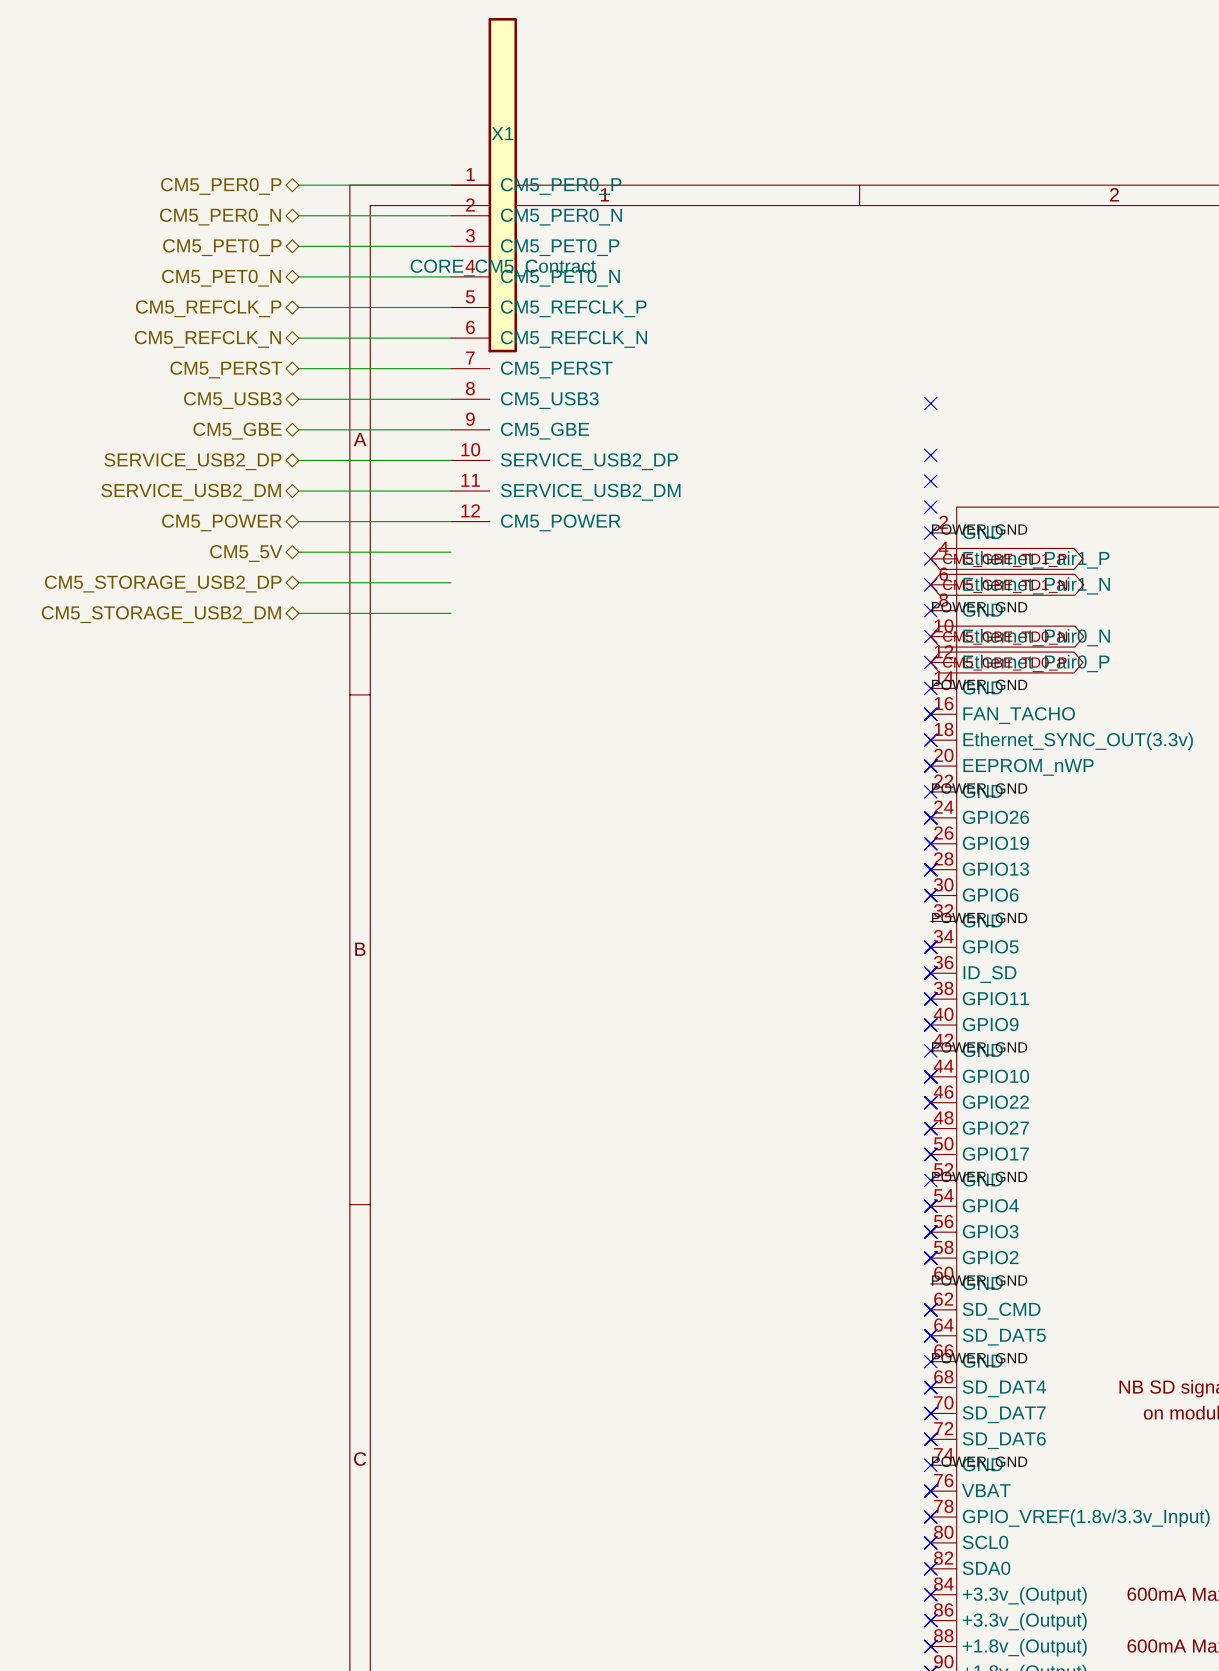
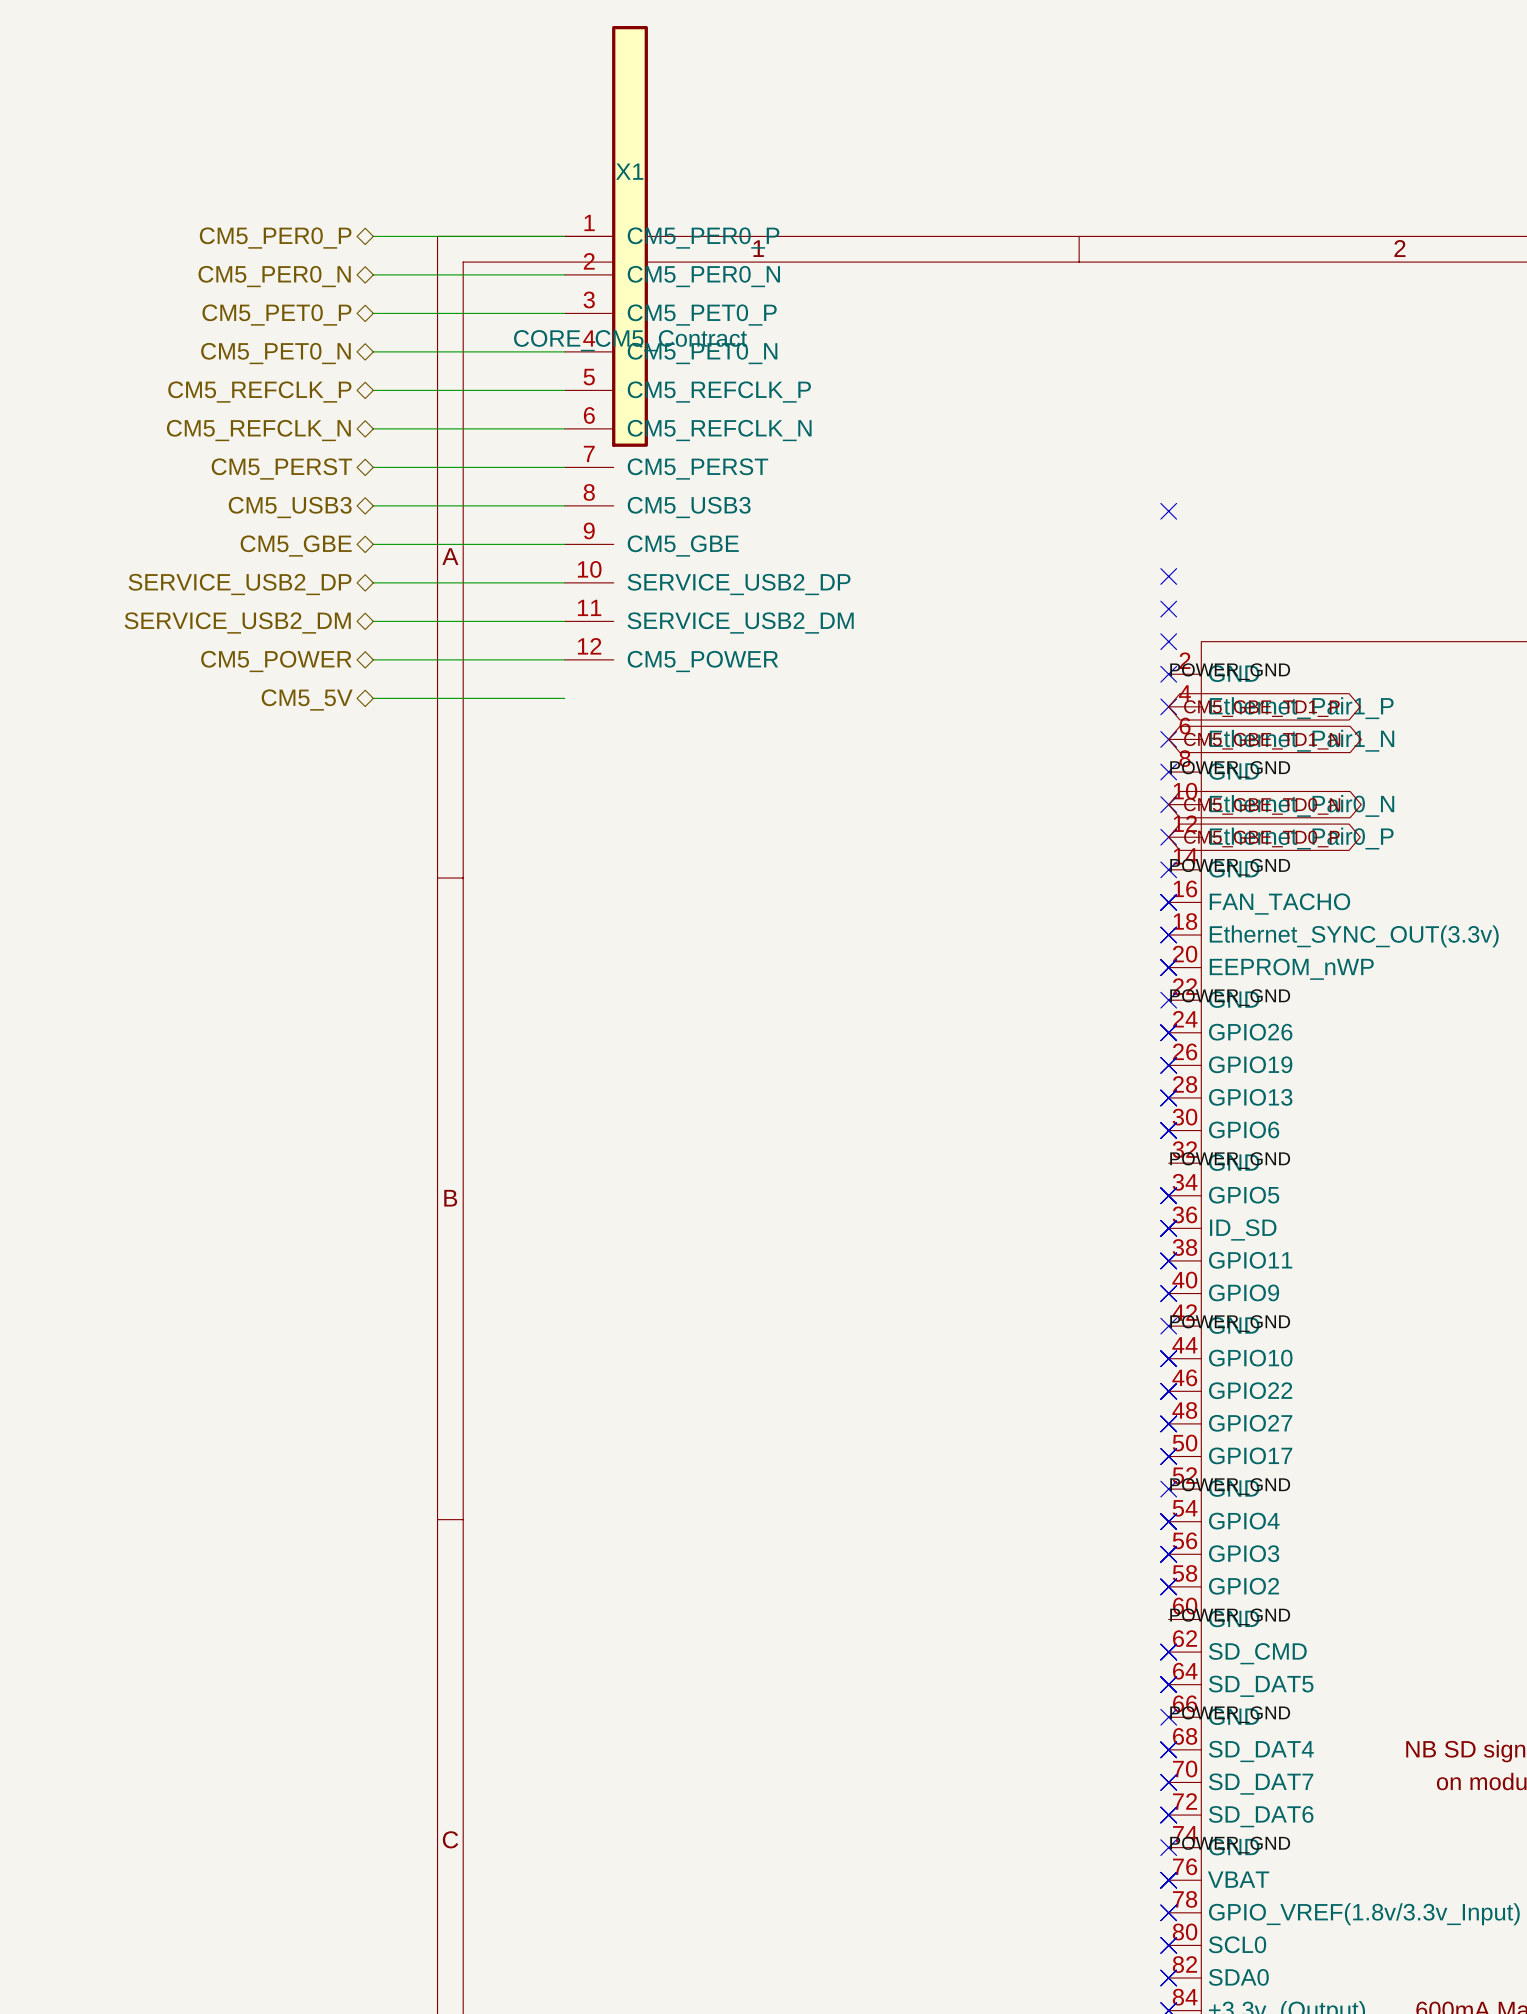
wire: (298, 582) (451, 582) -> none
hierarchical label: CM5_STORAGE_USB2_DP (163, 584) -> none
wire: (298, 613) (451, 613) -> none
hierarchical label: CM5_STORAGE_USB2_DM (161, 614) -> none

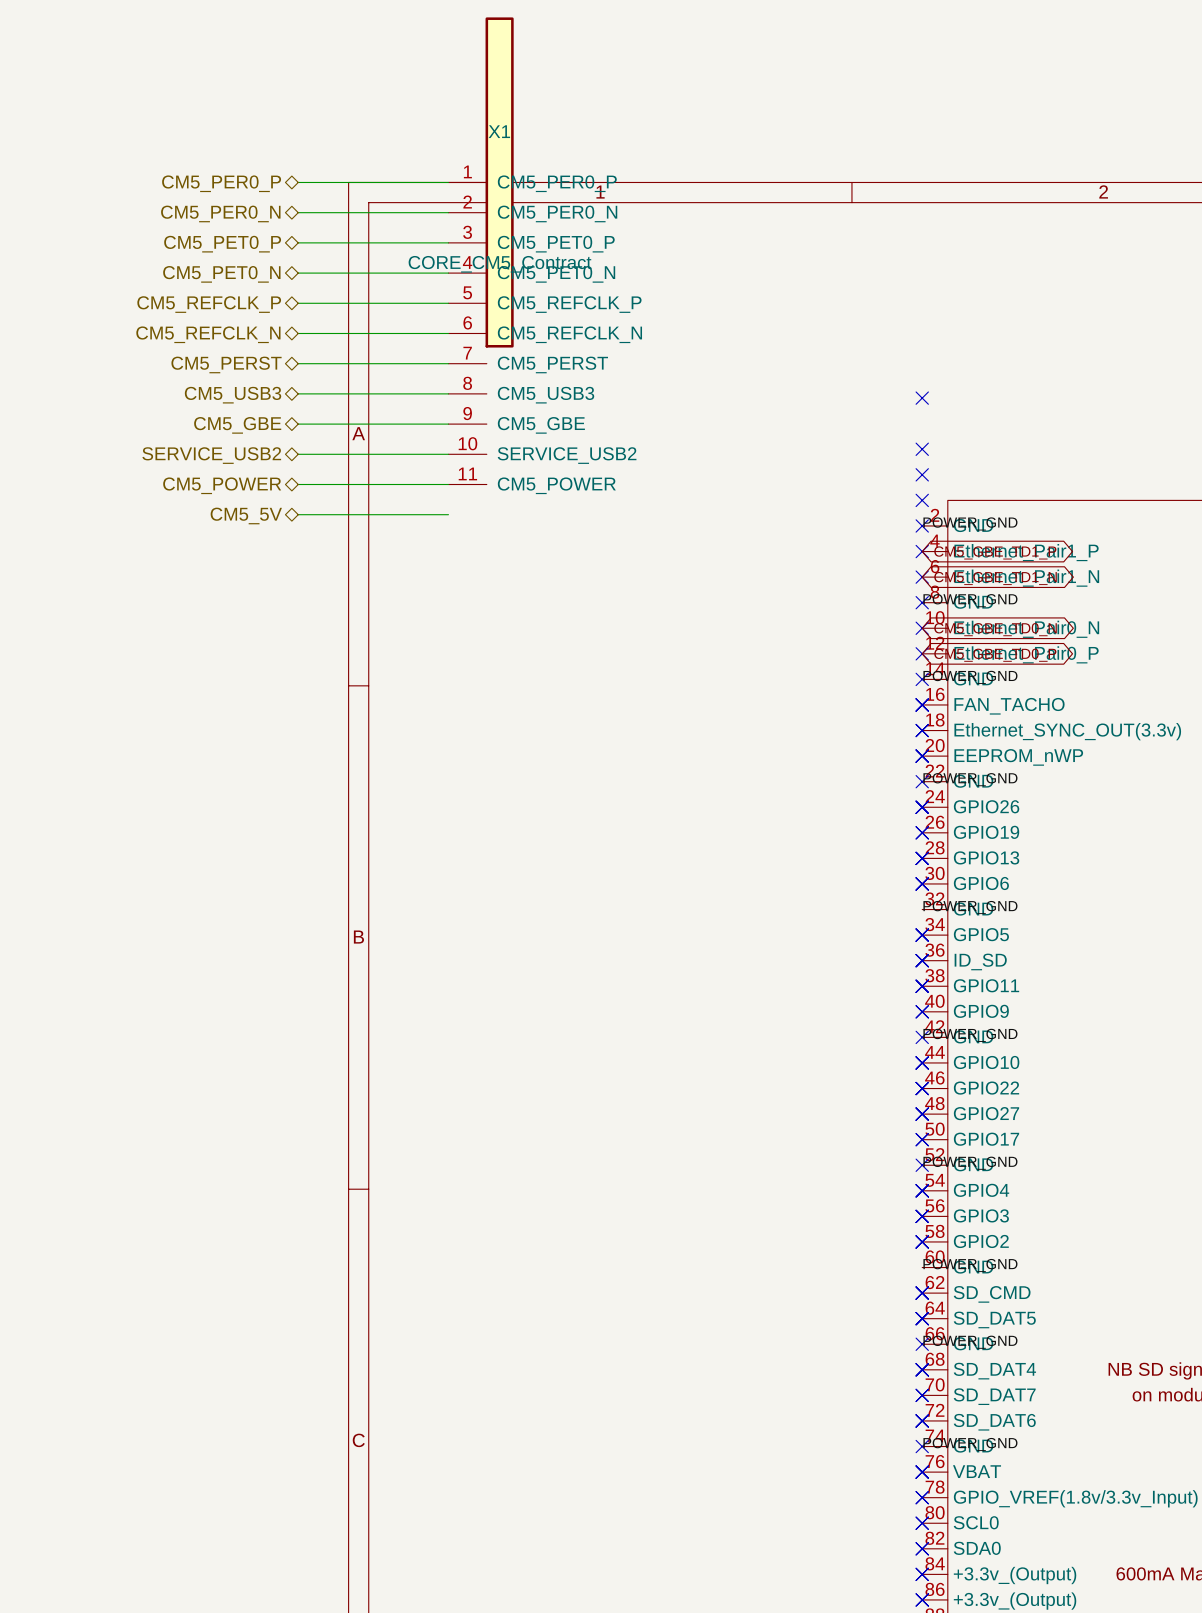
X1 symbol: [564, 26, 648, 660] -> [448, 17, 514, 485]
hierarchical label: SERVICE_USB2_DP (240, 584) -> SERVICE_USB2 (211, 455)
hierarchical label: SERVICE_USB2_DM (237, 623) -> CM5_POWER (222, 485)
hierarchical label: CM5_POWER (276, 661) -> CM5_5V (246, 515)
wire: (373, 698) (564, 698) -> none
hierarchical label: CM5_5V (307, 700) -> none

